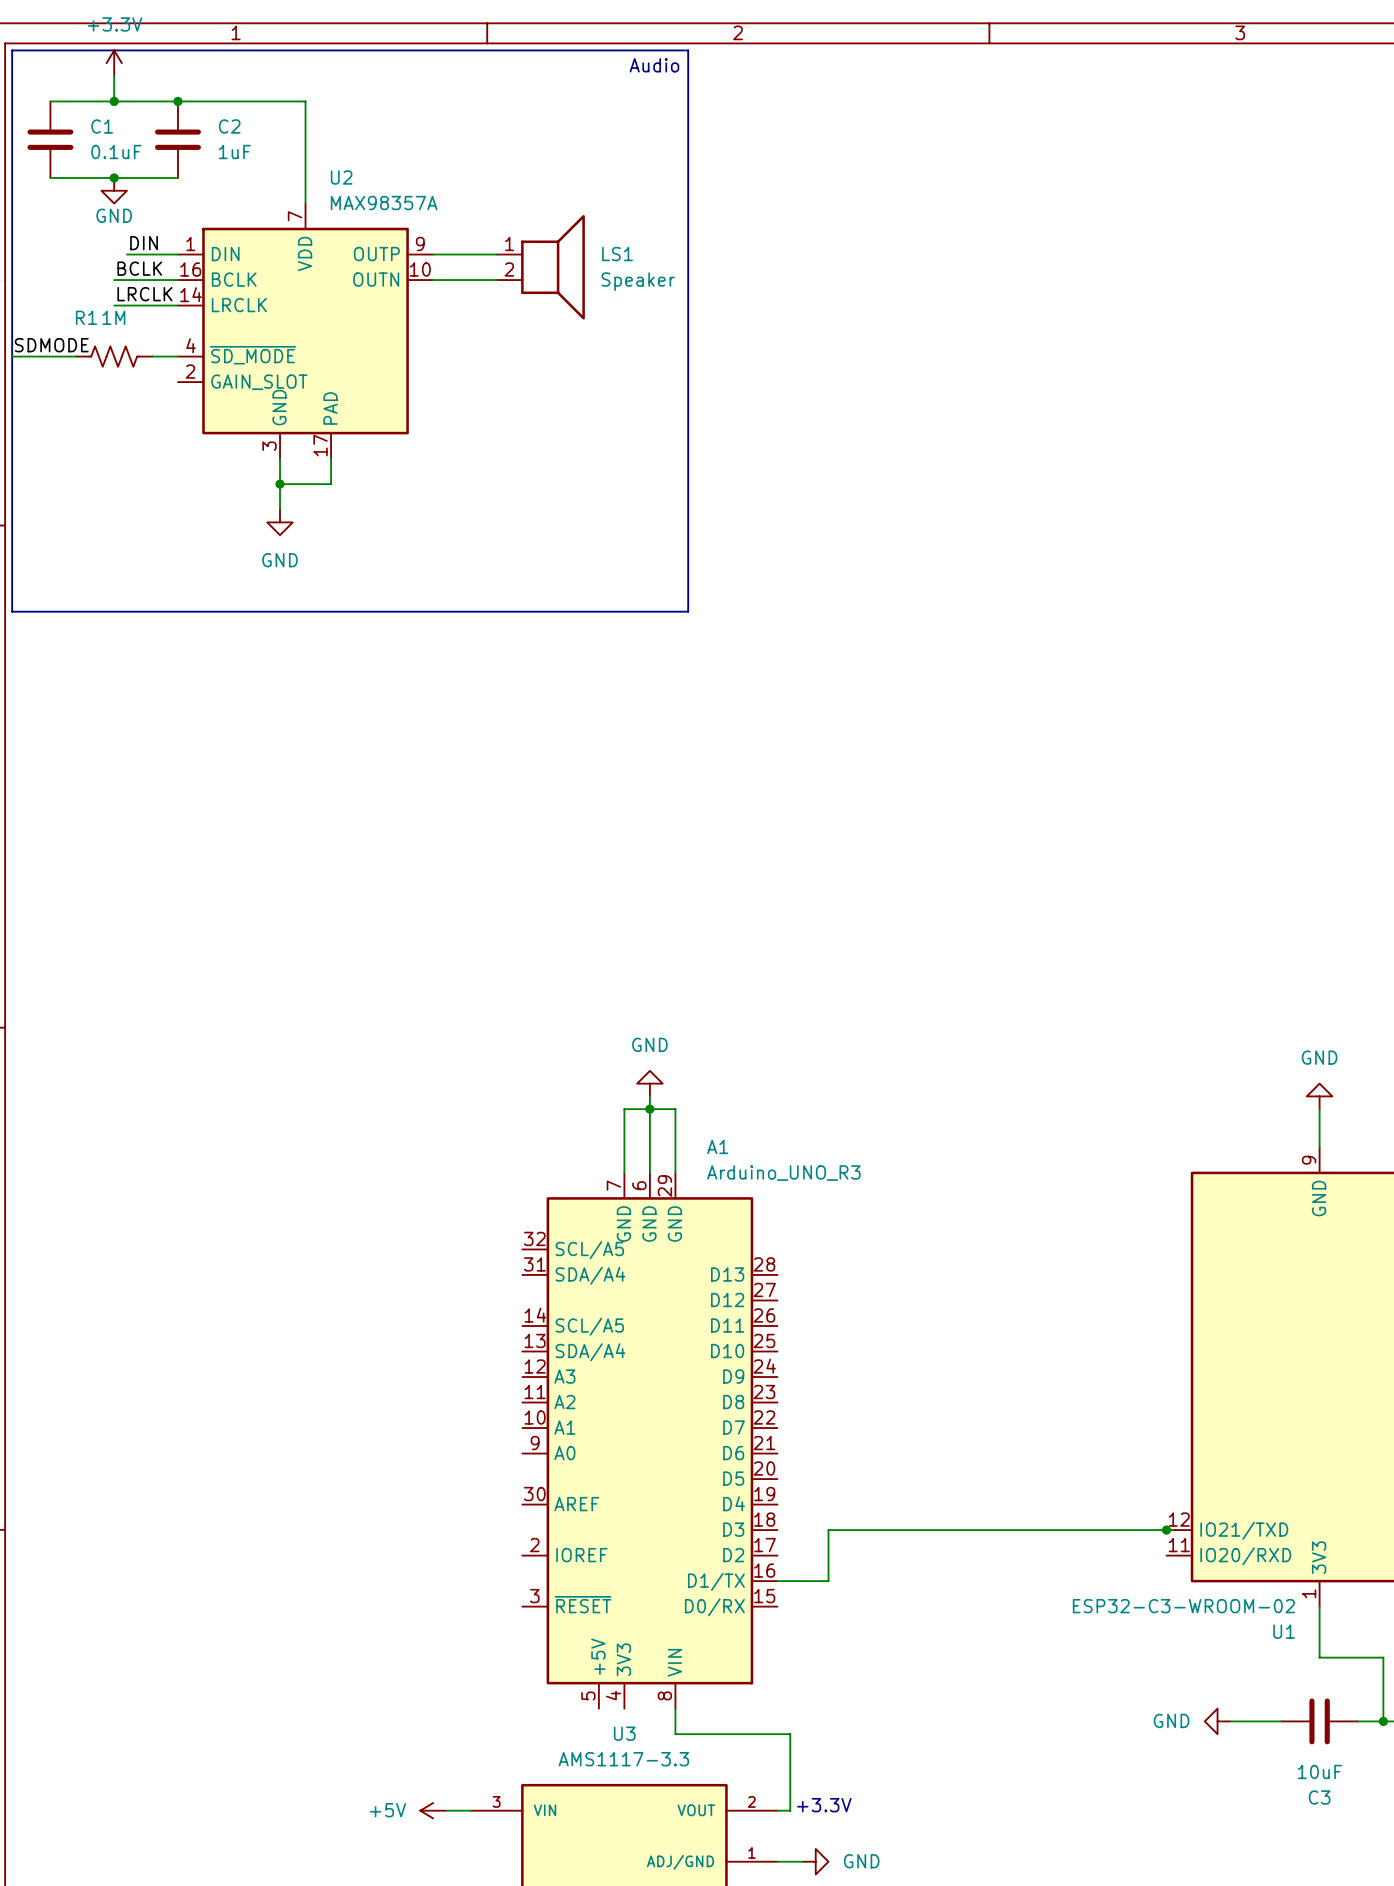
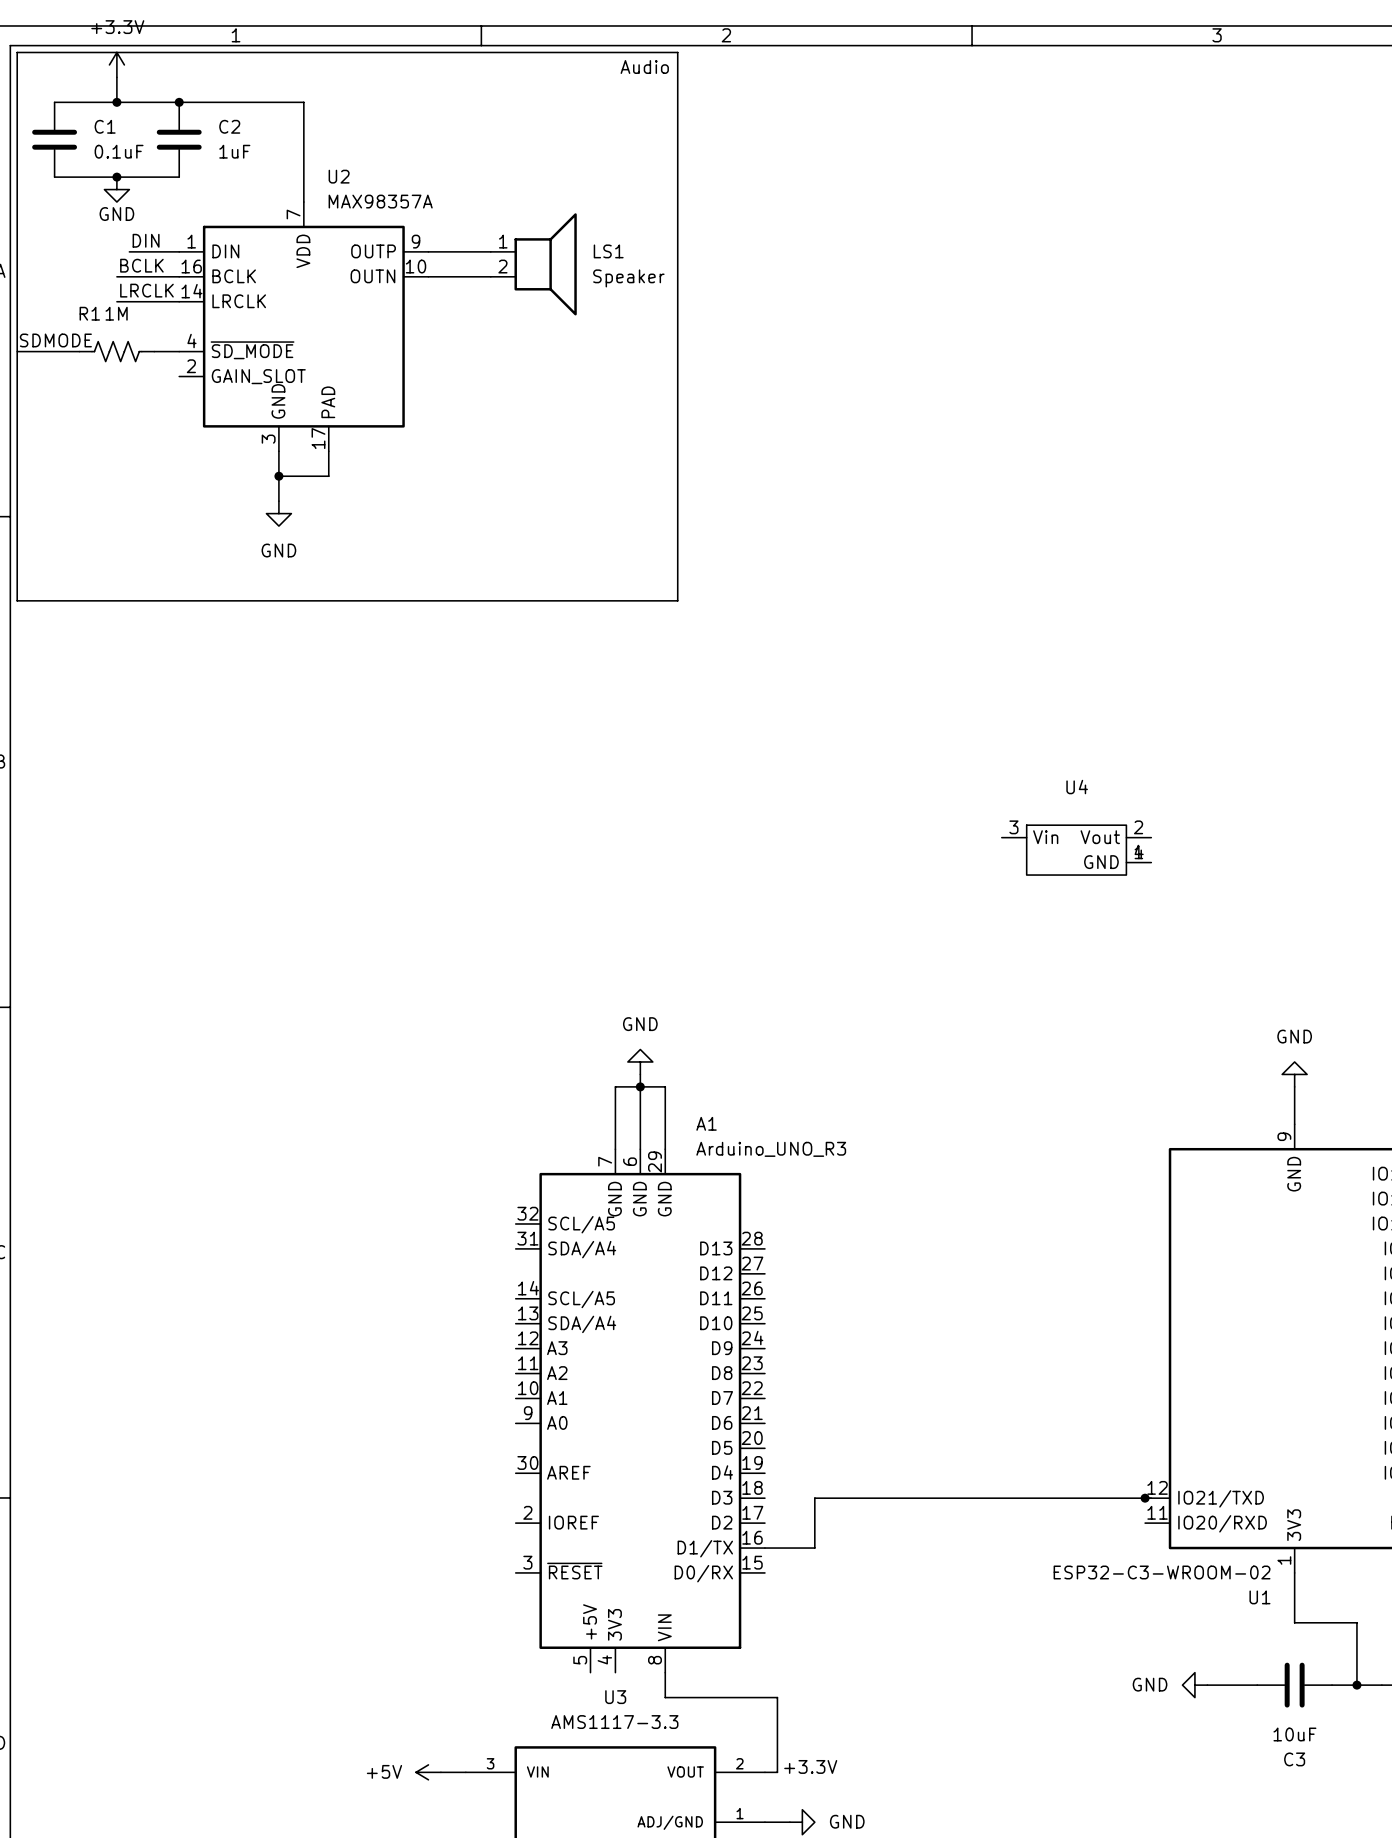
U4: none -> (1076, 850)

